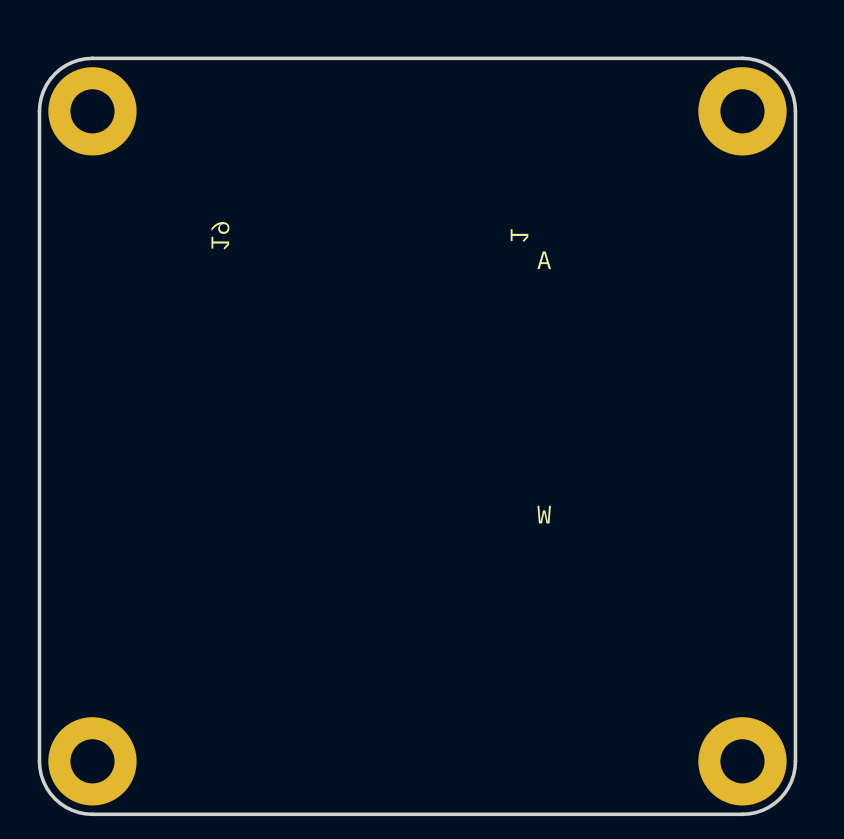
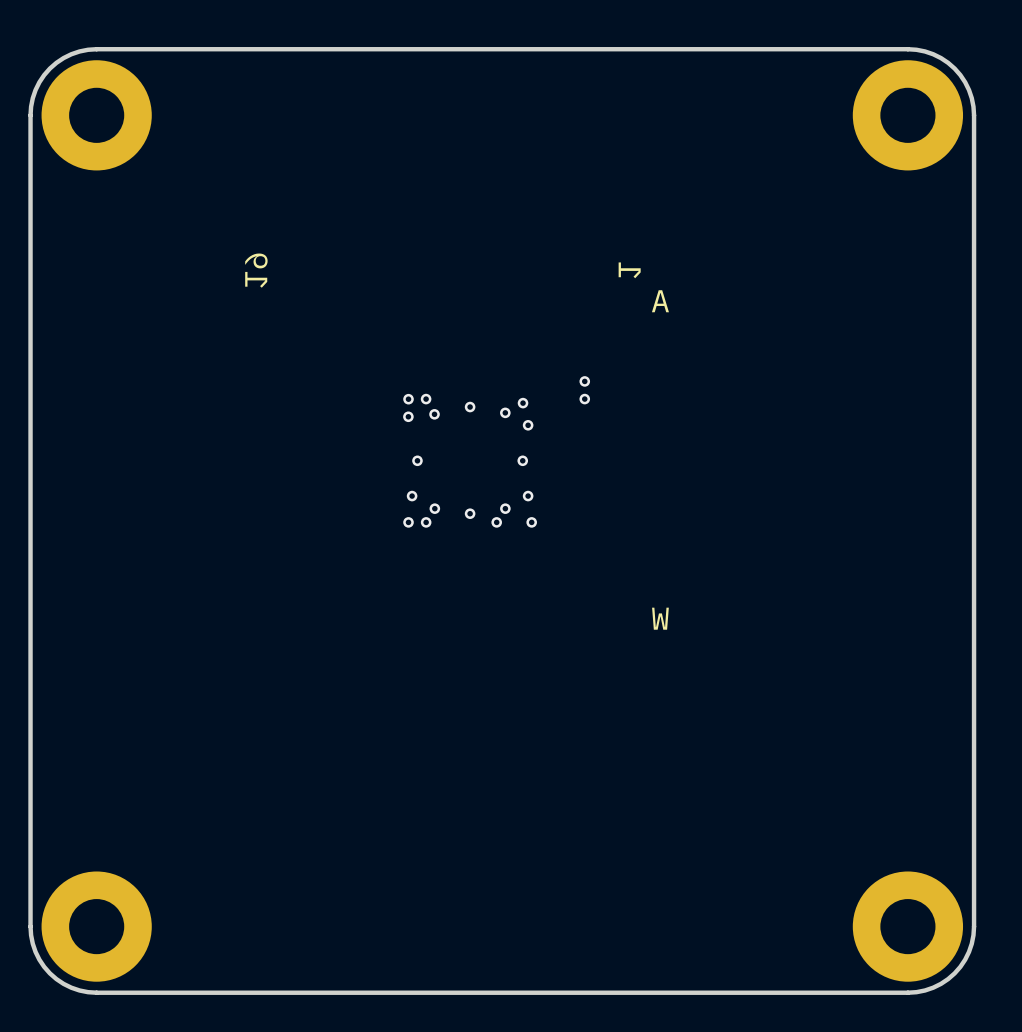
via: none -> (584, 381)
via: none -> (408, 399)
via: none -> (426, 399)
via: none -> (584, 399)
via: none -> (523, 403)
via: none -> (470, 407)
via: none -> (505, 412)
via: none -> (434, 414)
via: none -> (408, 416)
via: none -> (528, 425)
via: none -> (417, 460)
via: none -> (522, 460)
via: none -> (412, 496)
via: none -> (528, 496)
via: none -> (434, 508)
via: none -> (505, 508)
via: none -> (470, 513)
via: none -> (408, 522)
via: none -> (426, 522)
via: none -> (496, 522)
via: none -> (531, 522)

